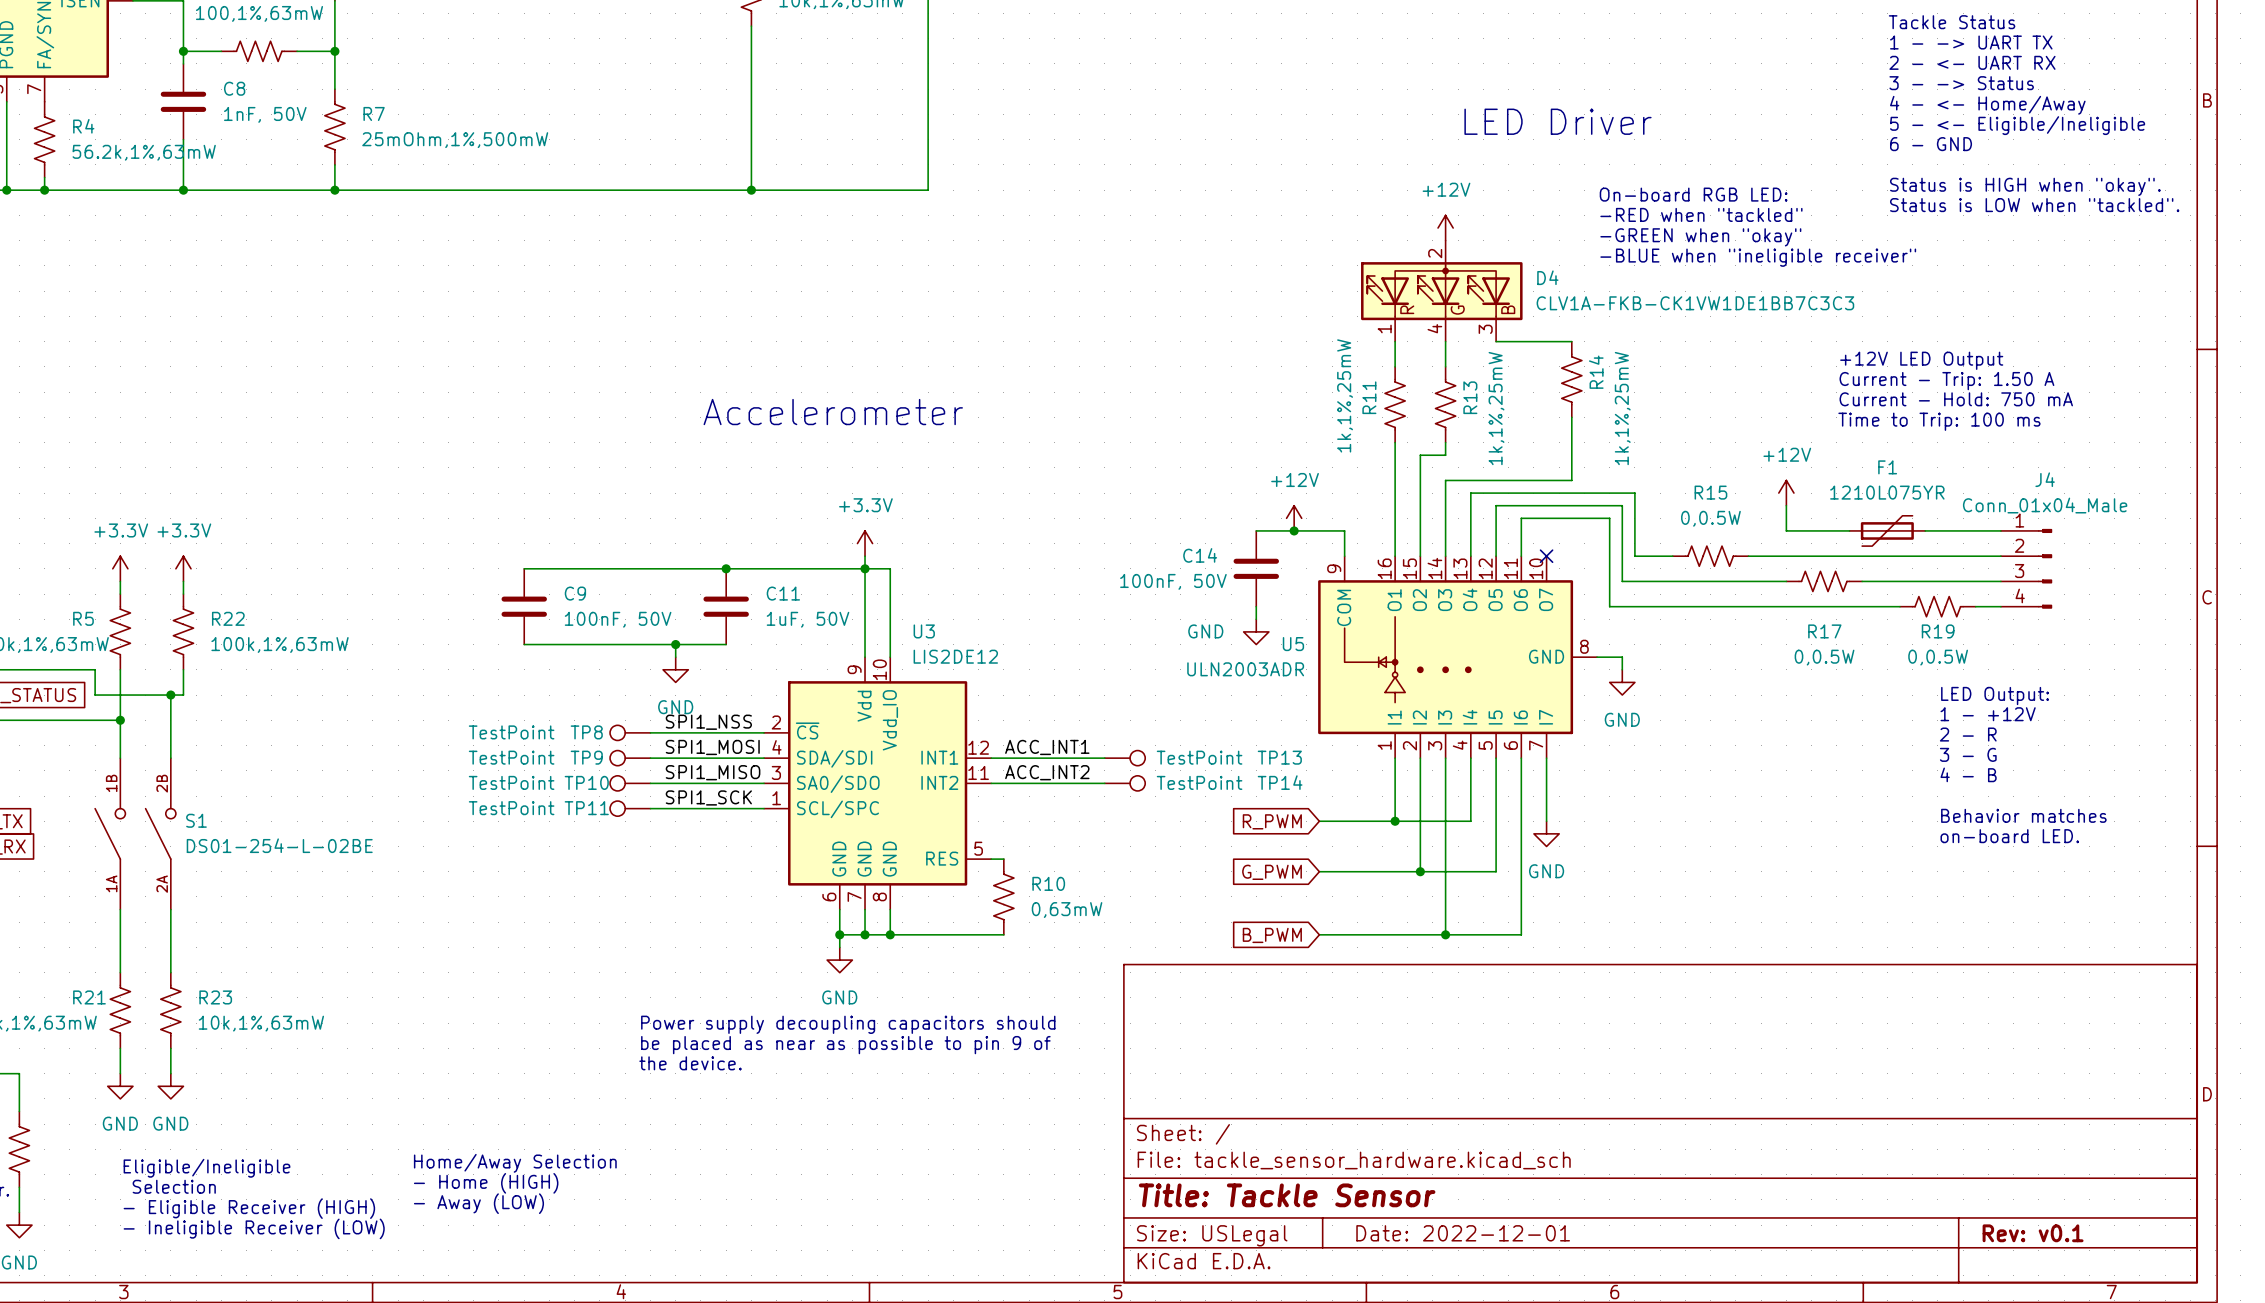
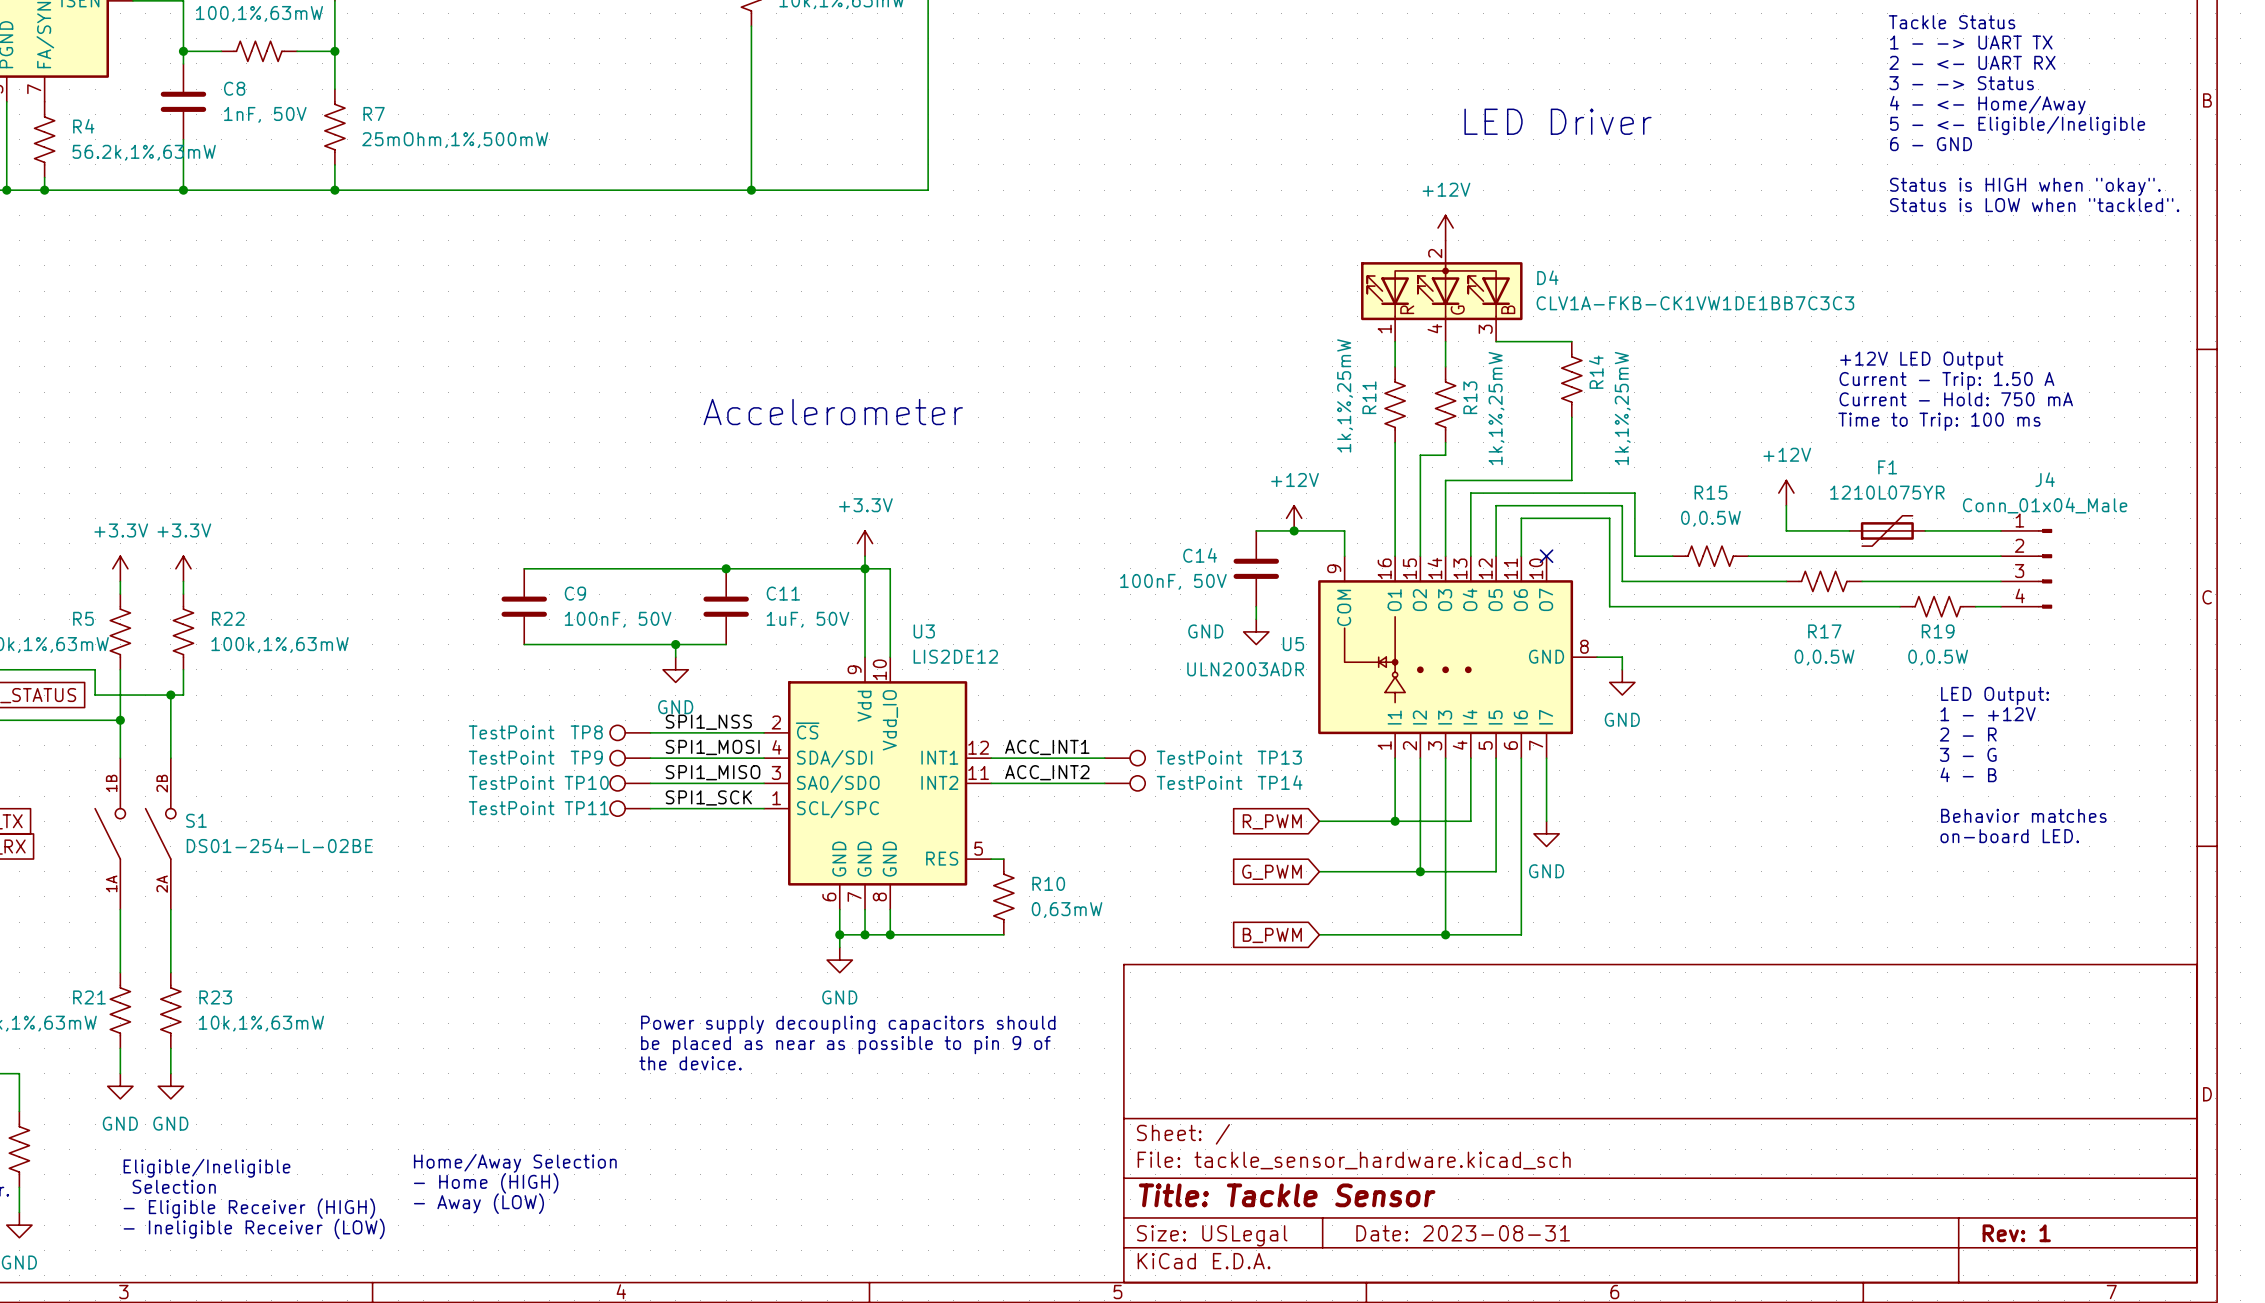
text: On-board RGB LED: (1693, 194) -> none
text: -RED when "tackled" (1701, 214) -> none
text: -GREEN when "okay" (1700, 237) -> none
text: -BLUE when "ineligible receiver" (1758, 257) -> none
title block: Date: 2022-12-01 (1463, 1233) -> Date: 2023-08-31 (1463, 1233)
title block: Rev: v0.1 (2033, 1233) -> Rev: 1 (2016, 1233)

